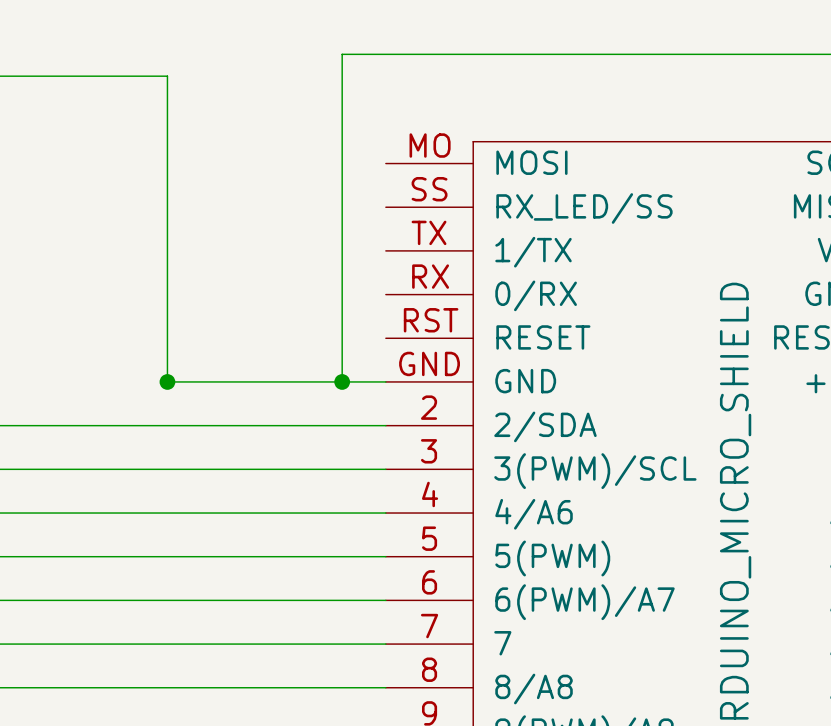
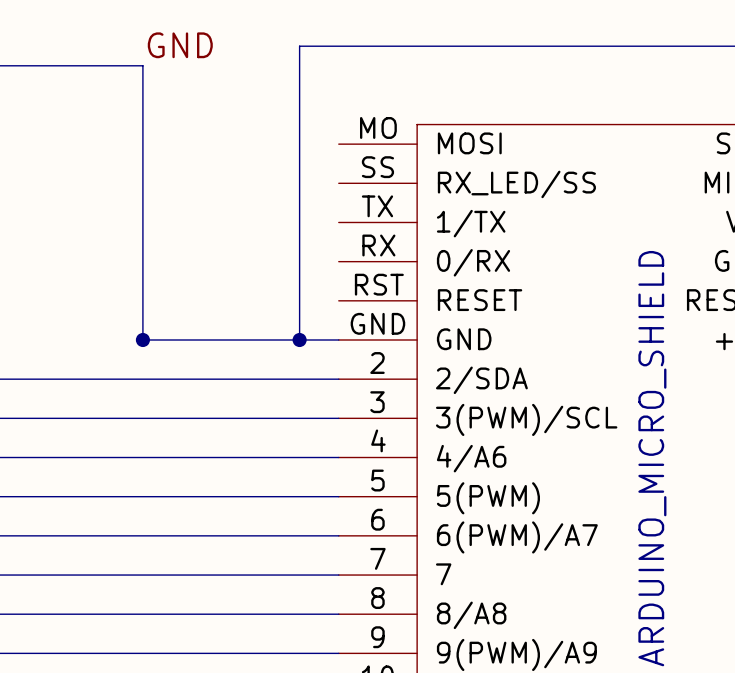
label: none -> GND (180, 45)

